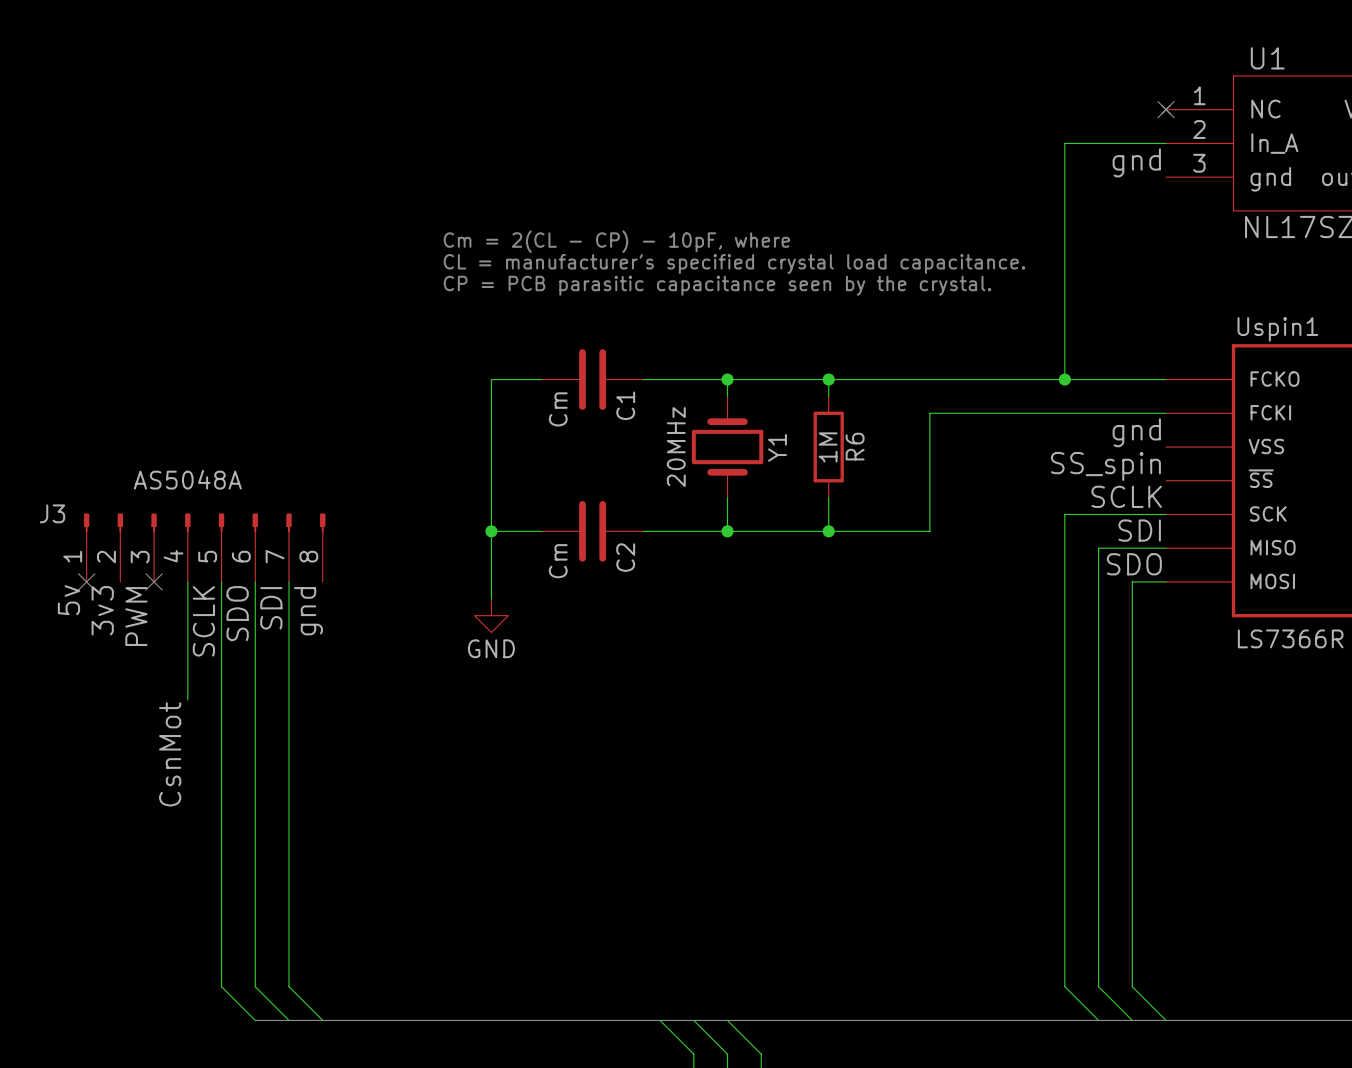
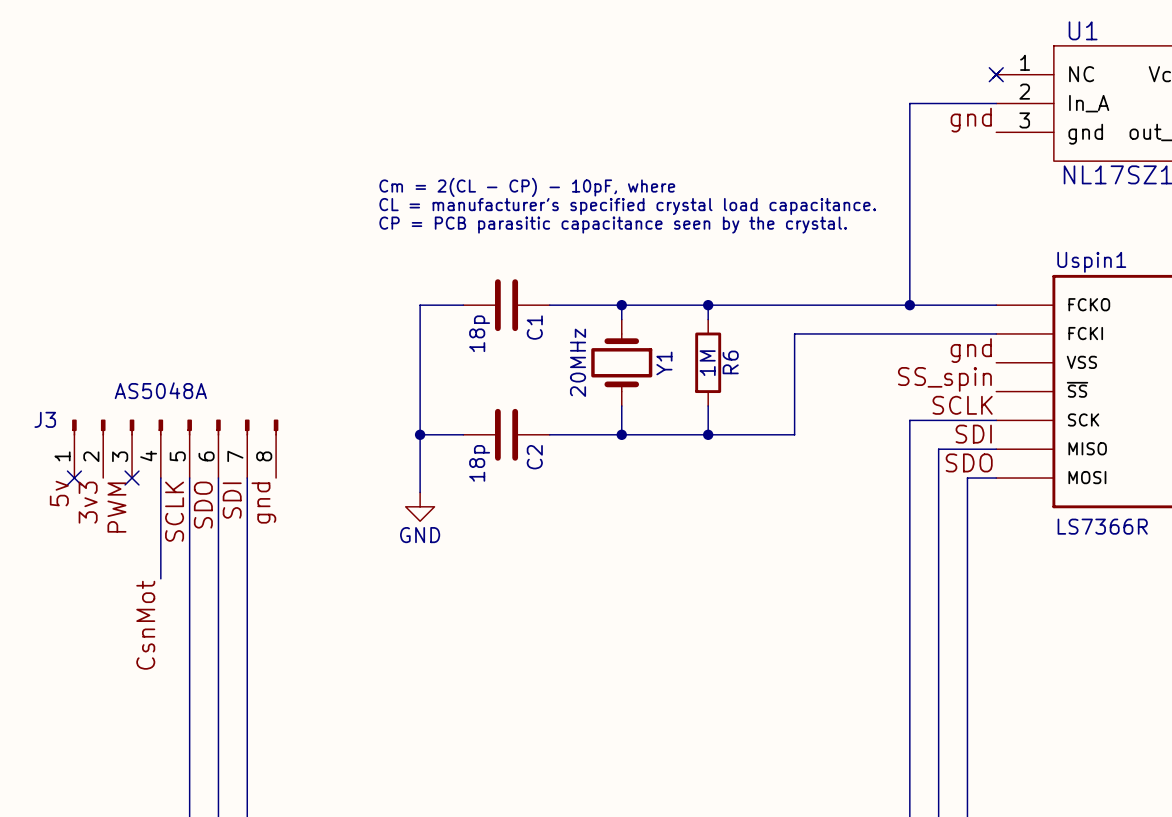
C1 value: Cm (558, 409) -> 18p (479, 333)
C2 value: Cm (558, 561) -> 18p (479, 463)

